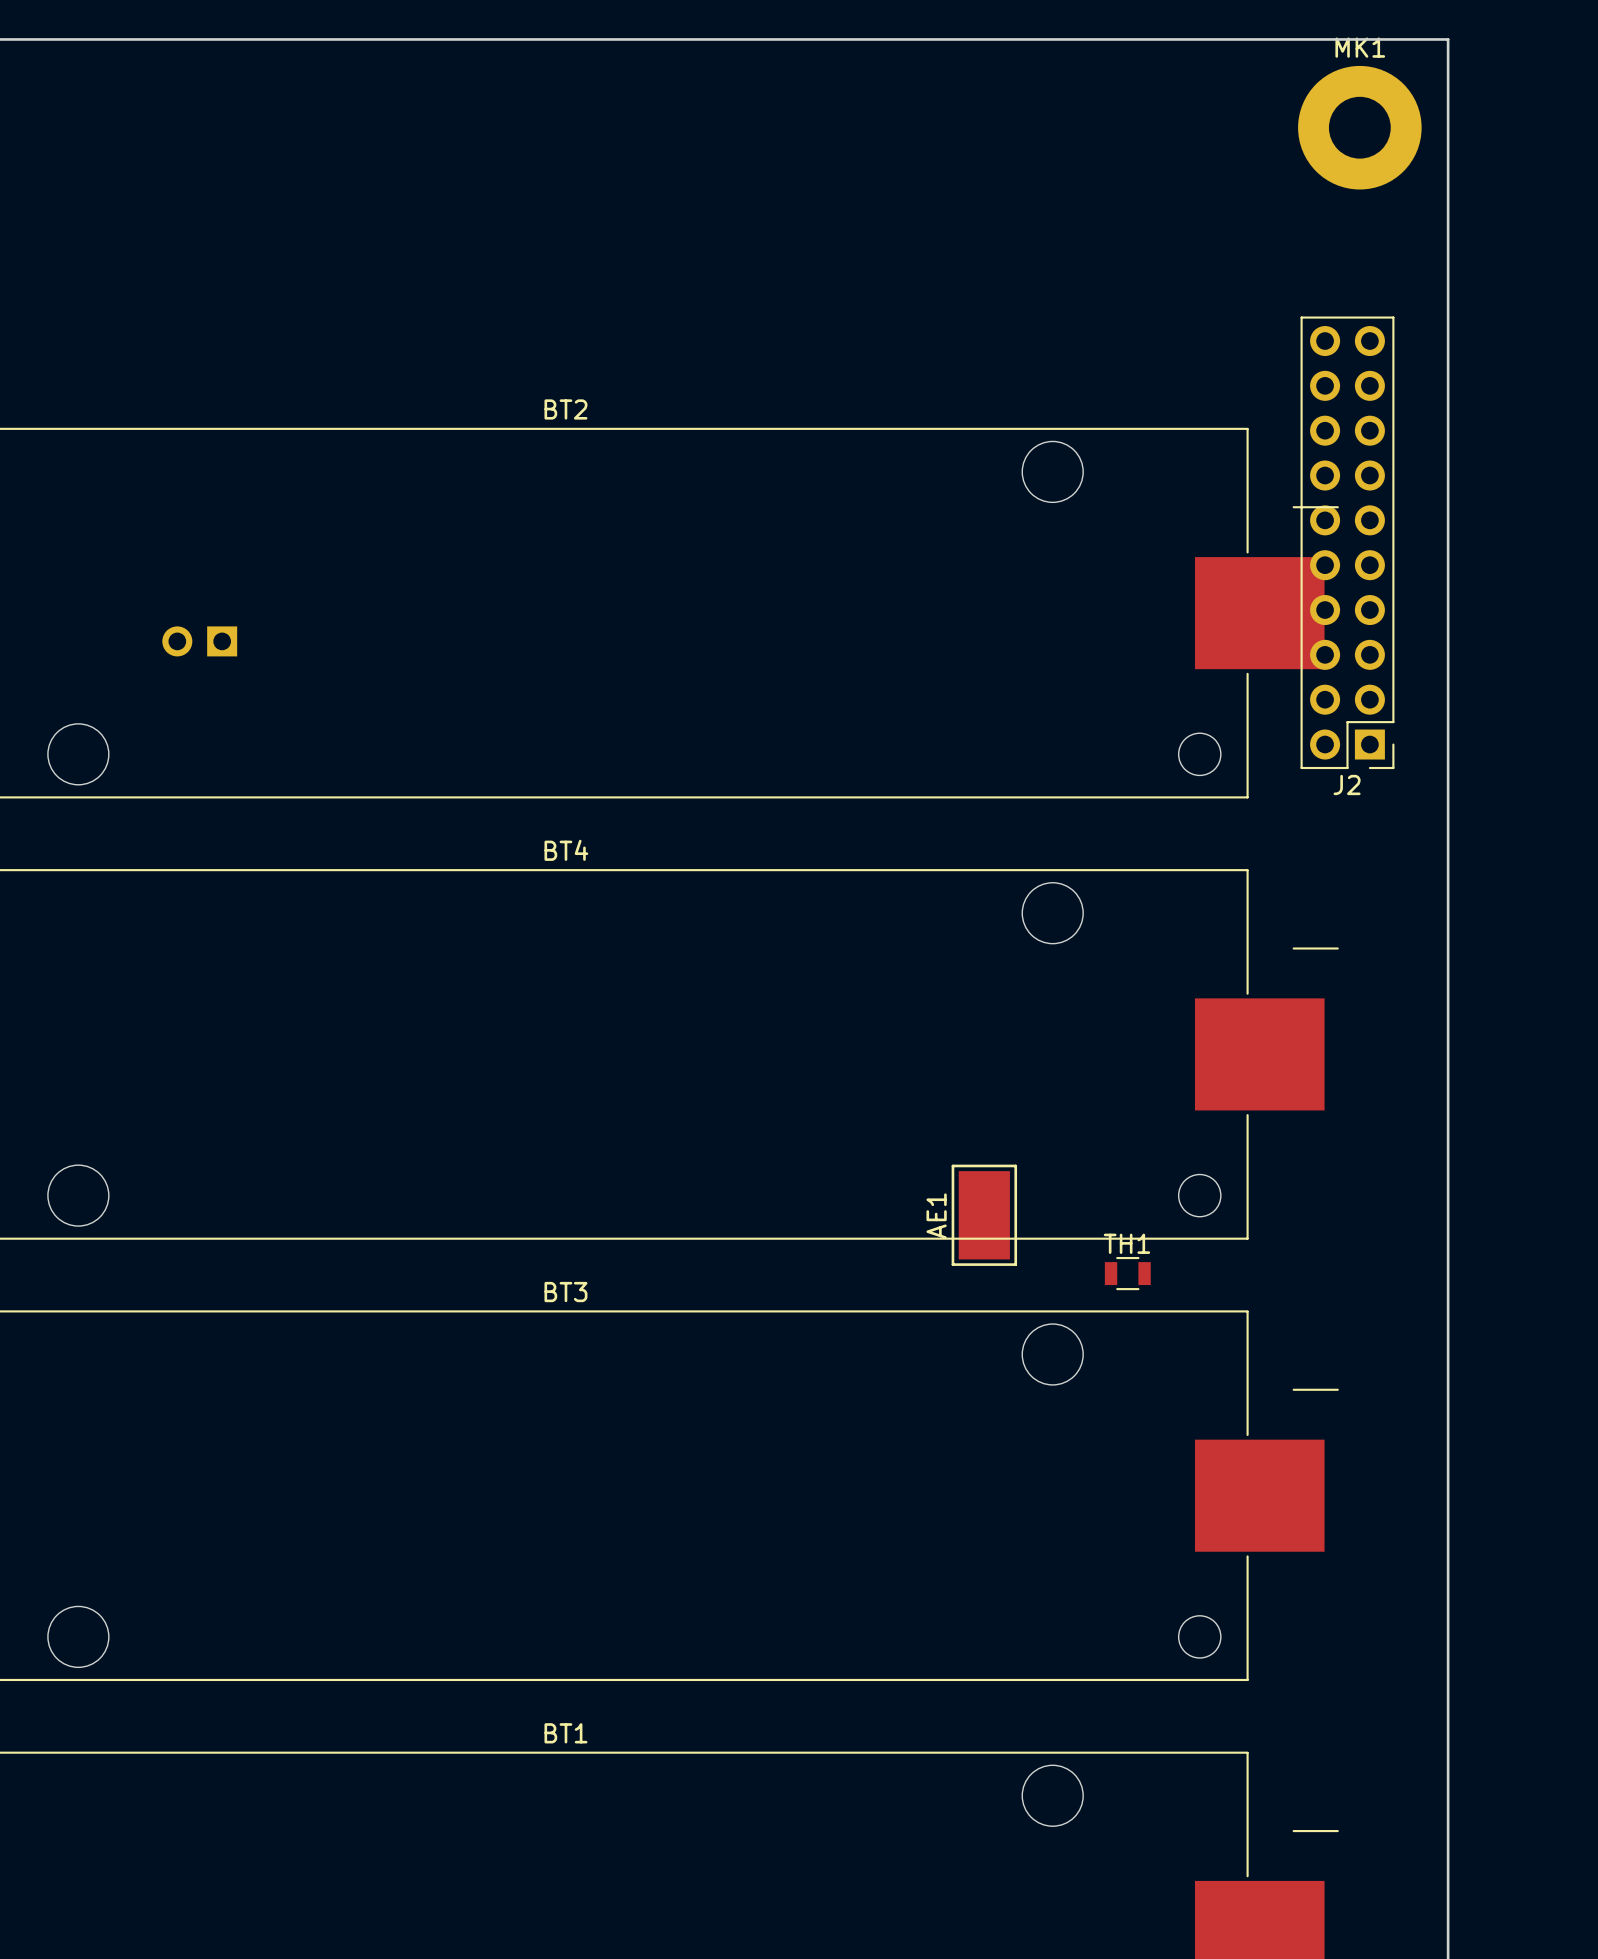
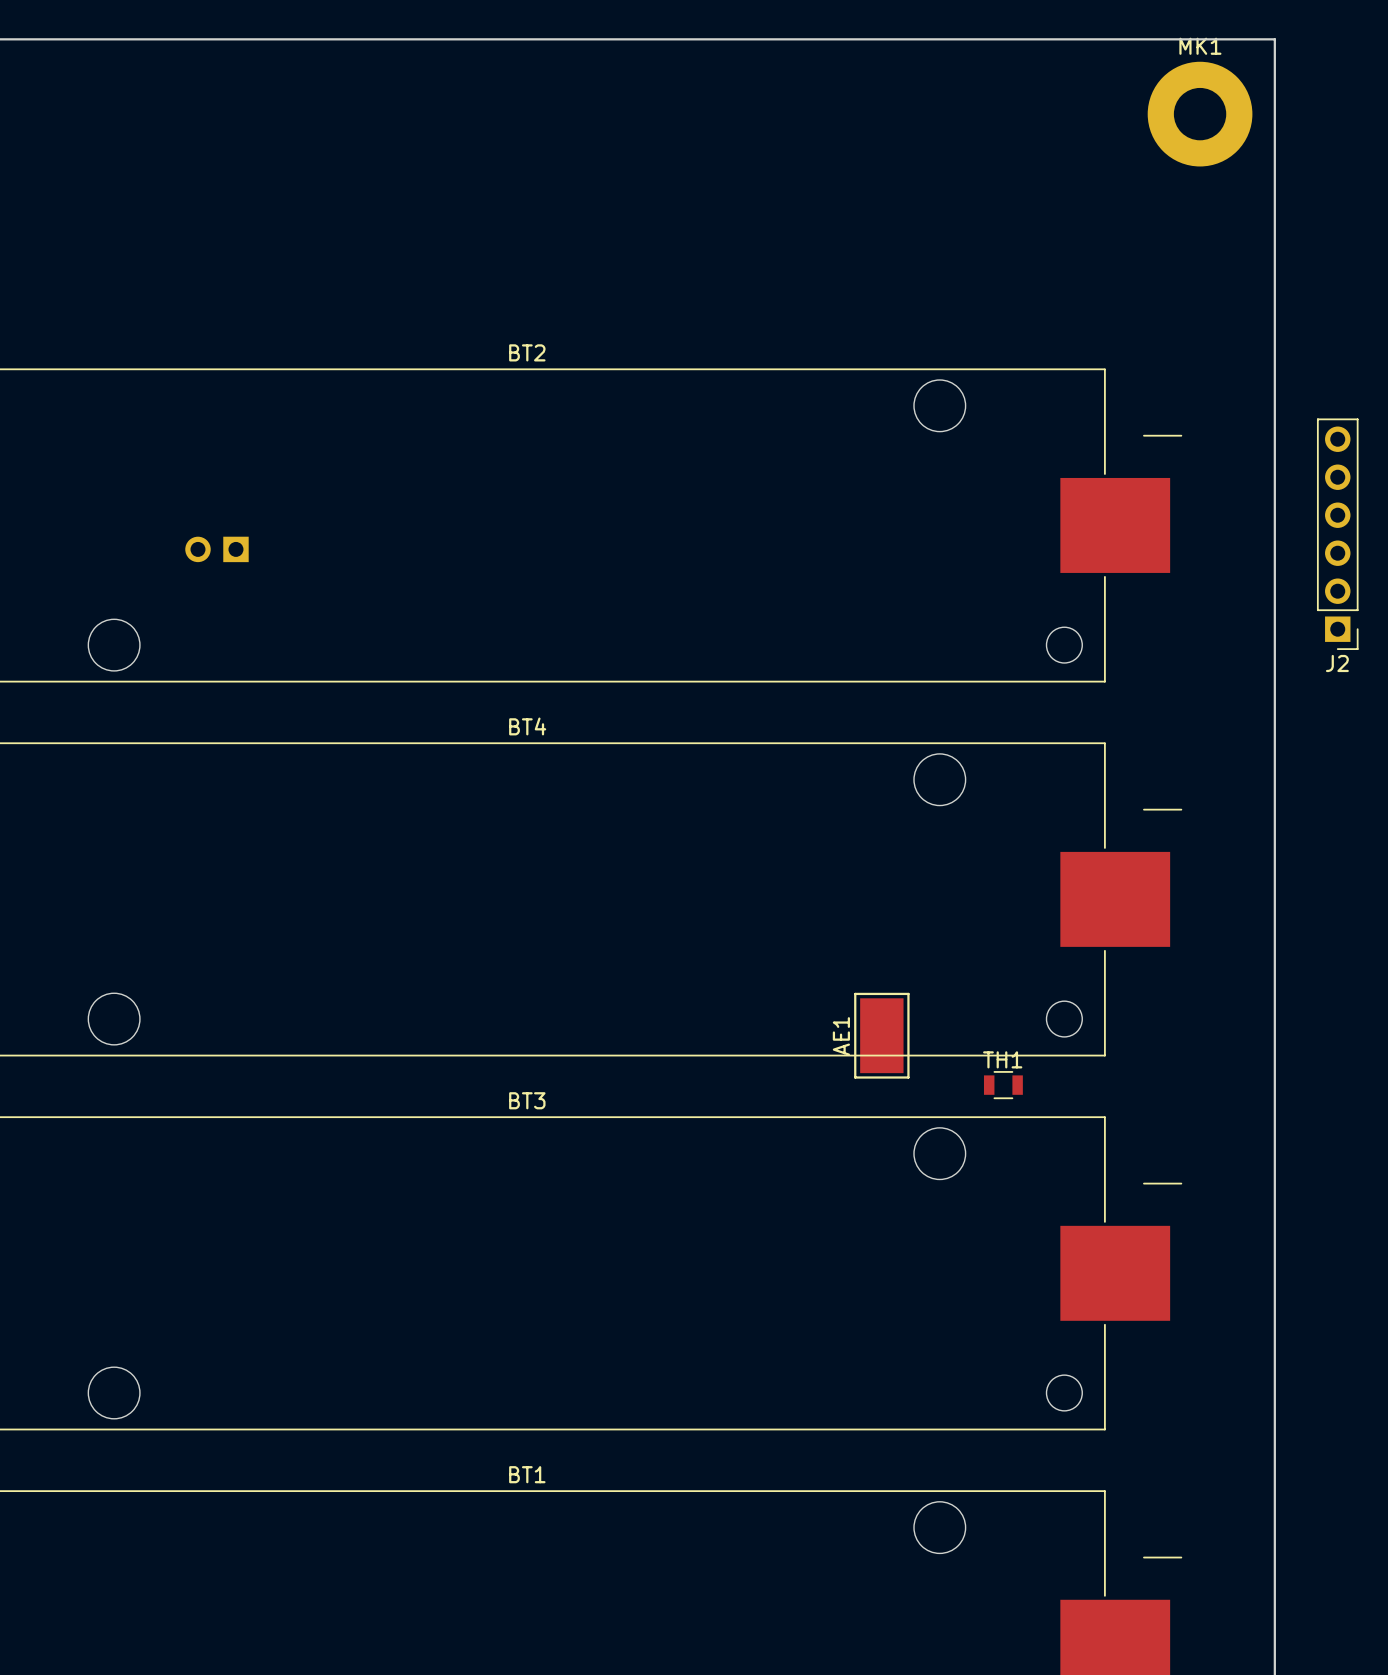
J2 footprint: [1300, 316, 1395, 770] -> [1316, 418, 1359, 650]
J2 name position: J2 (1347, 784) -> J2 (1337, 663)

